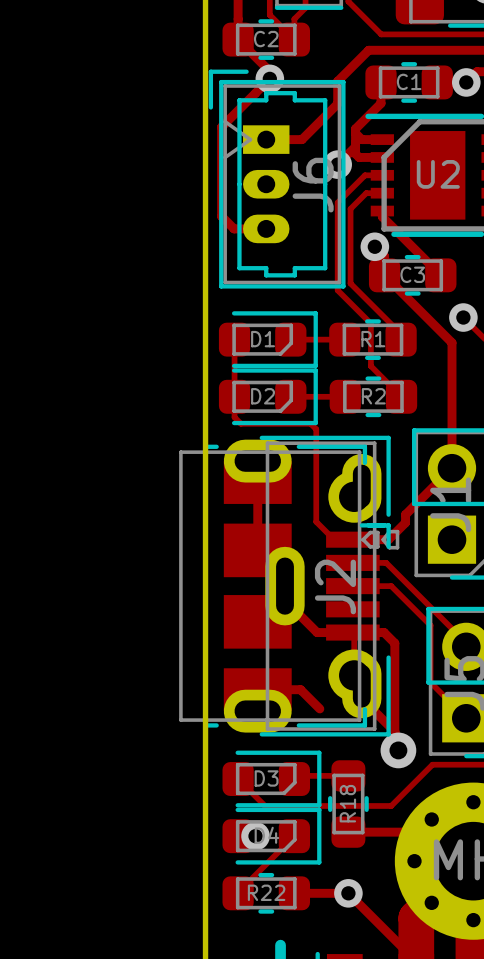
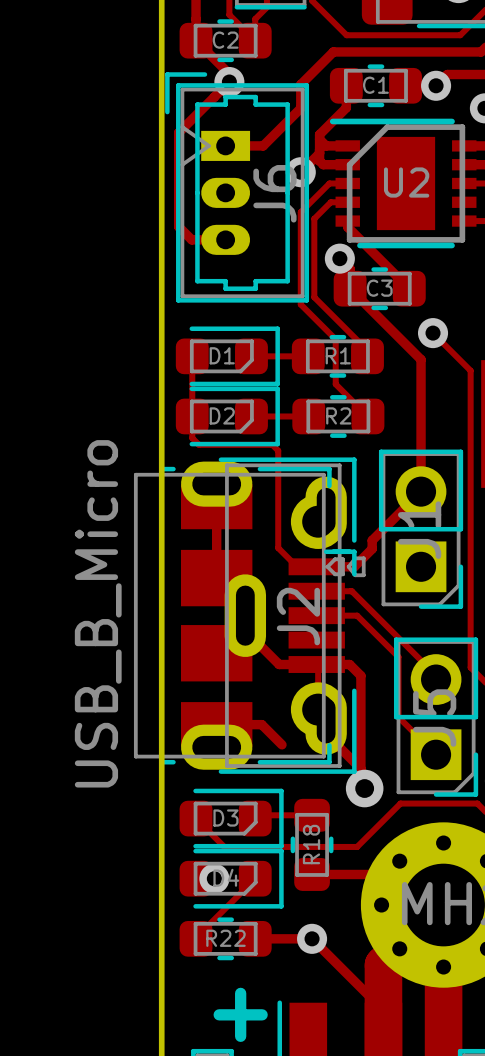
J2 value: none -> USB_B_Micro (98, 613)

